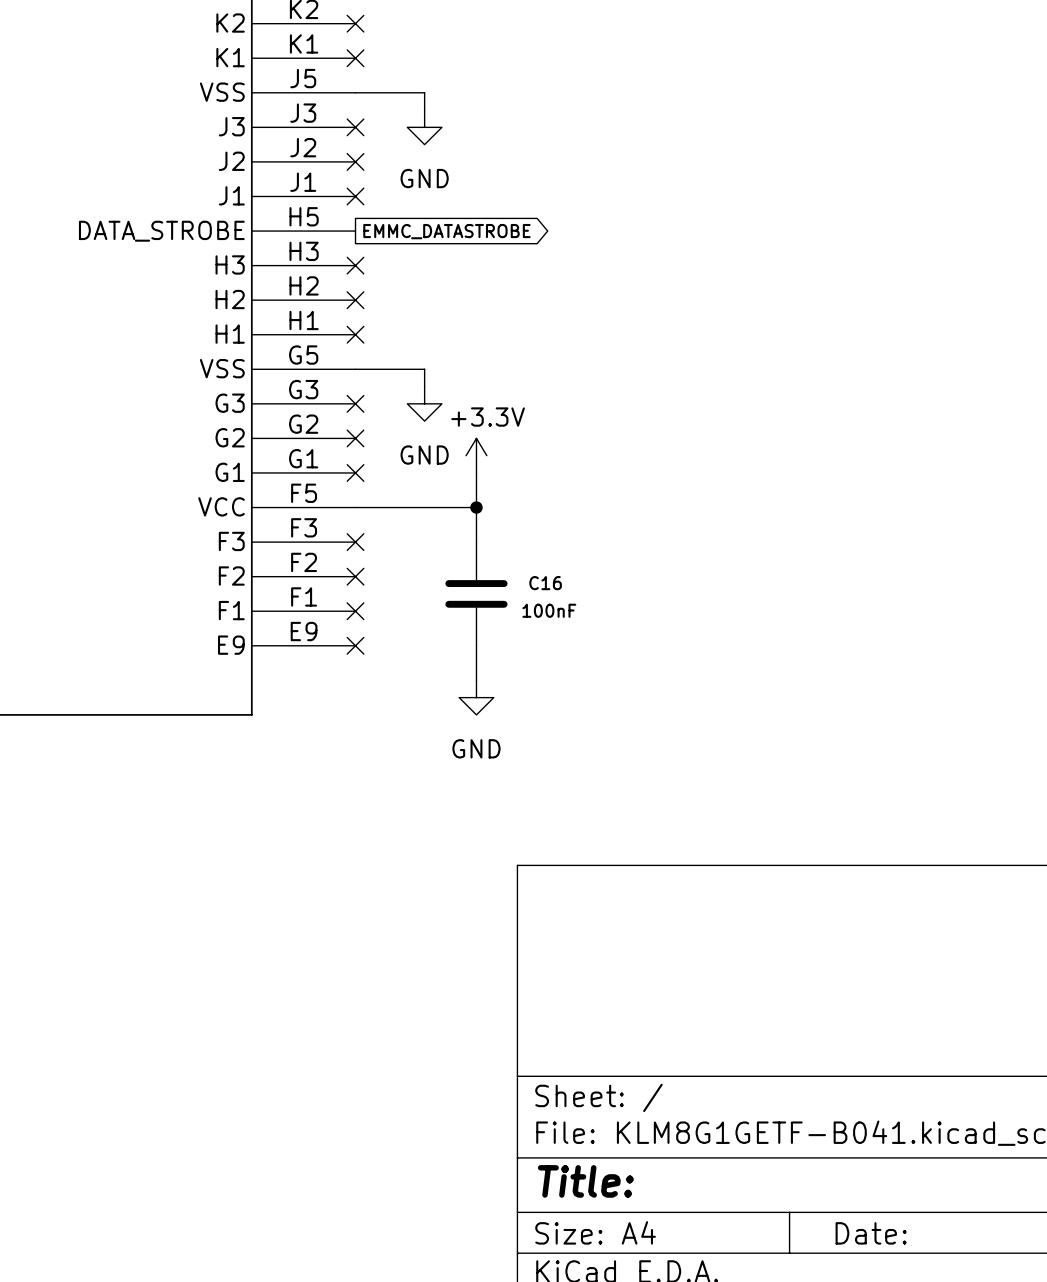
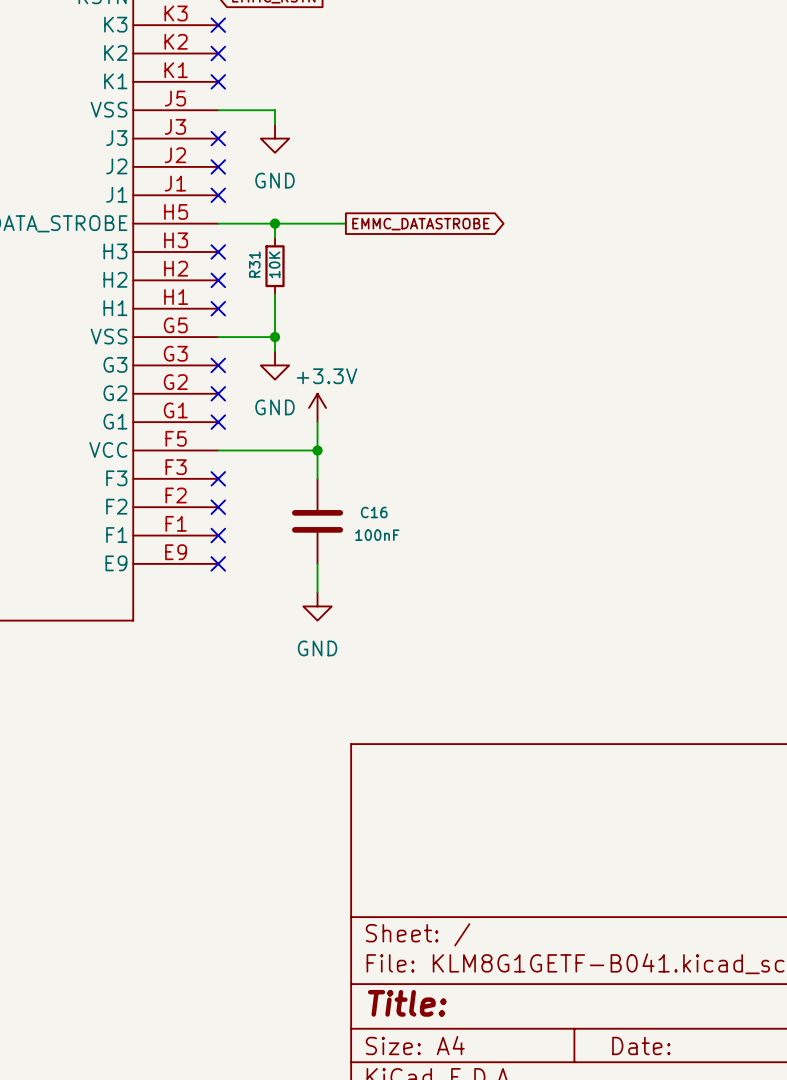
wire: none -> (218, 223) (345, 223)
wire: none -> (274, 223) (274, 237)
junction: none -> (274, 223)
global label position: EMMC_DATASTROBE (446, 231) -> EMMC_DATASTROBE (420, 224)
R31: none -> 10K (274, 266)
wire: none -> (274, 294) (274, 337)
junction: none -> (274, 337)

